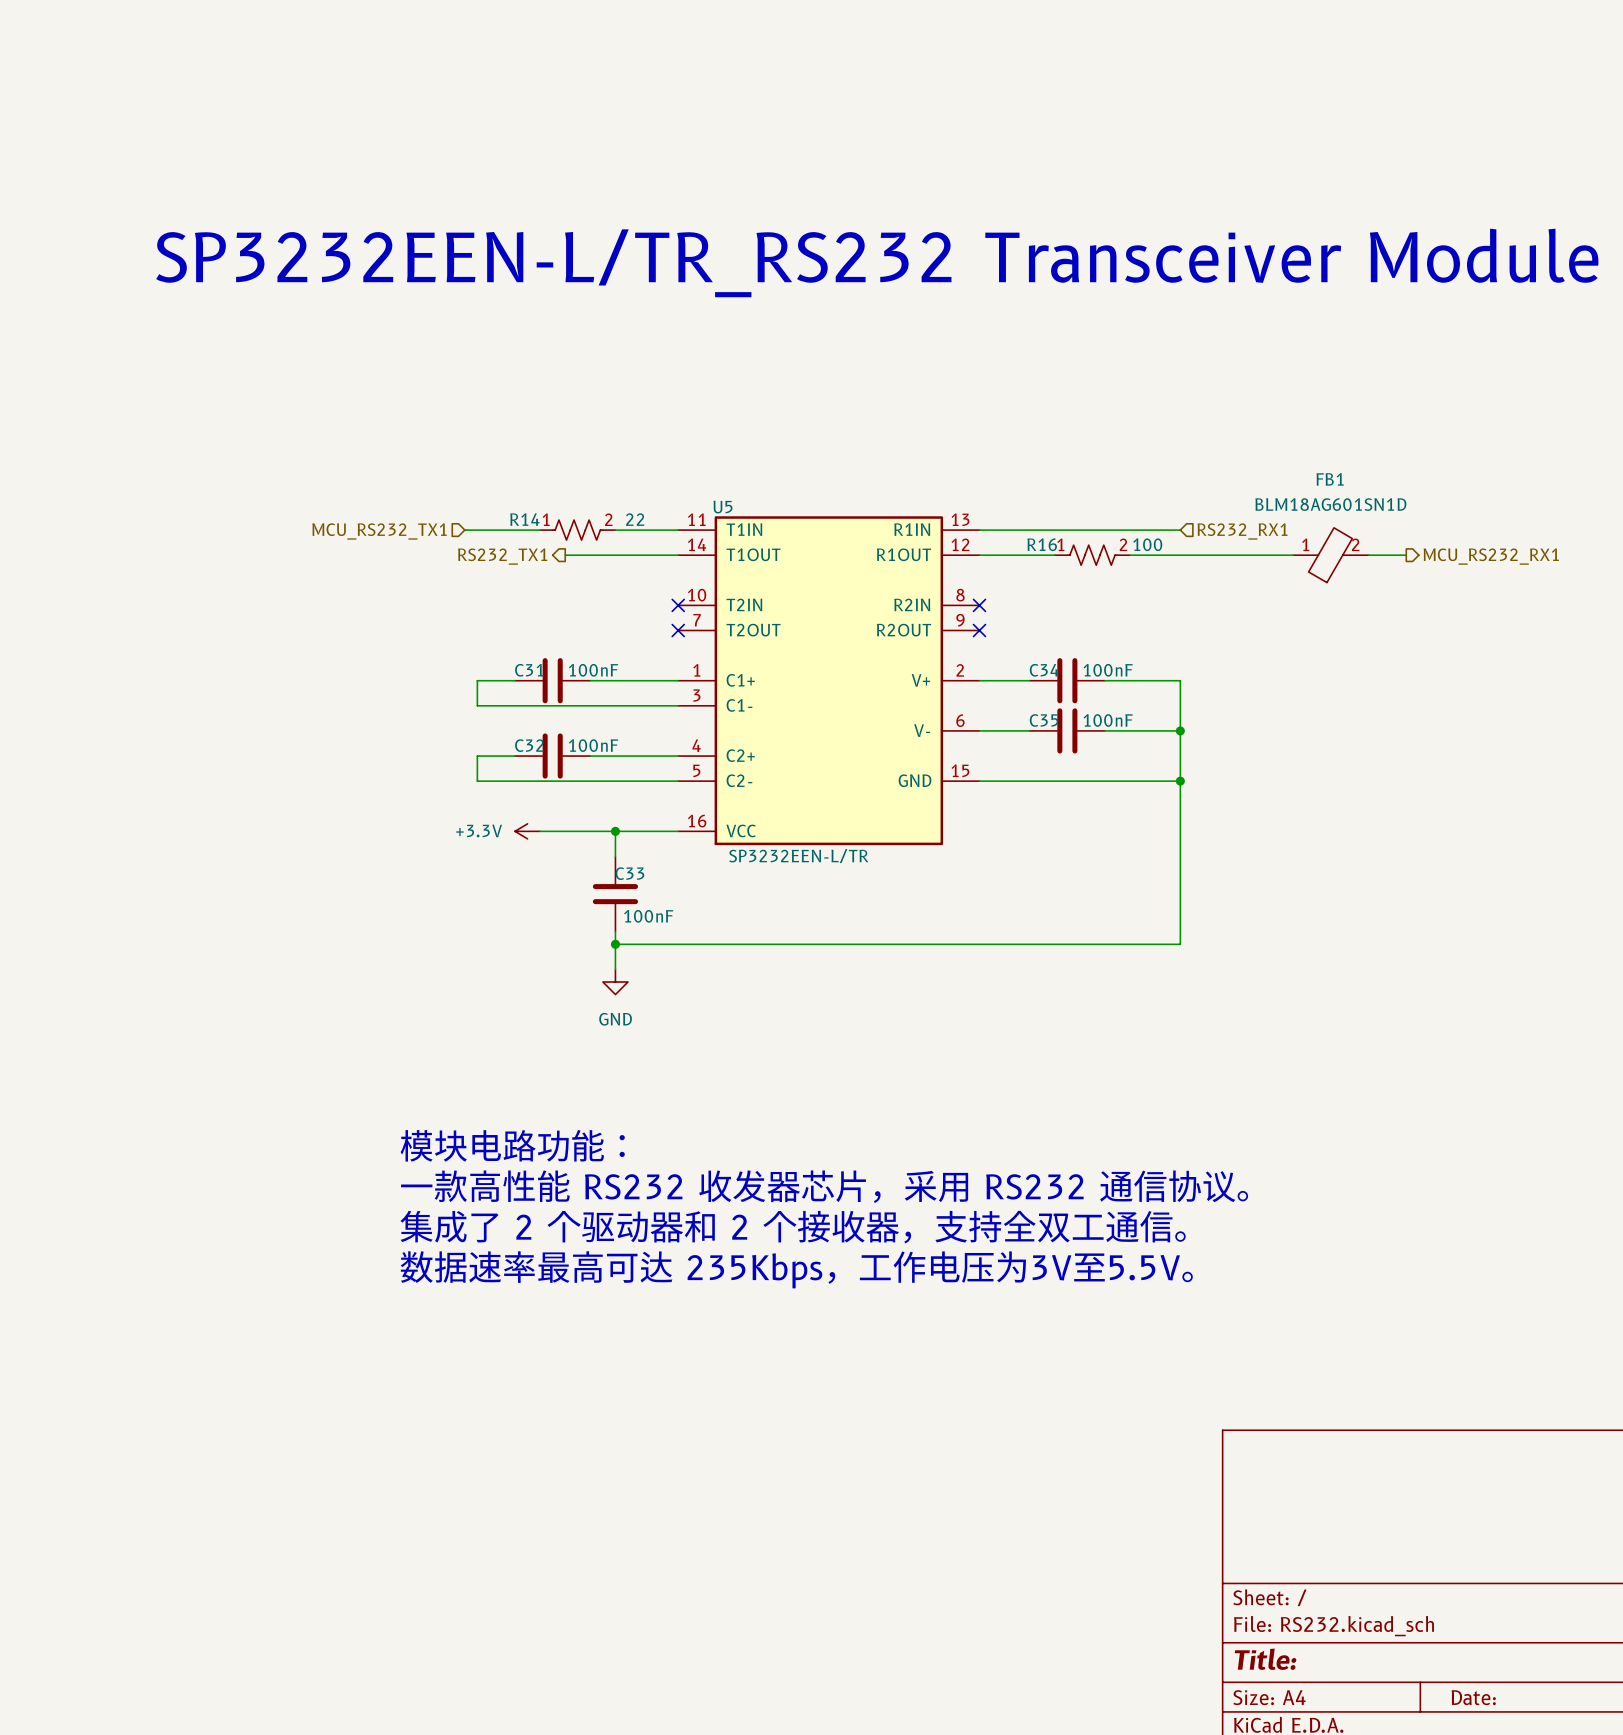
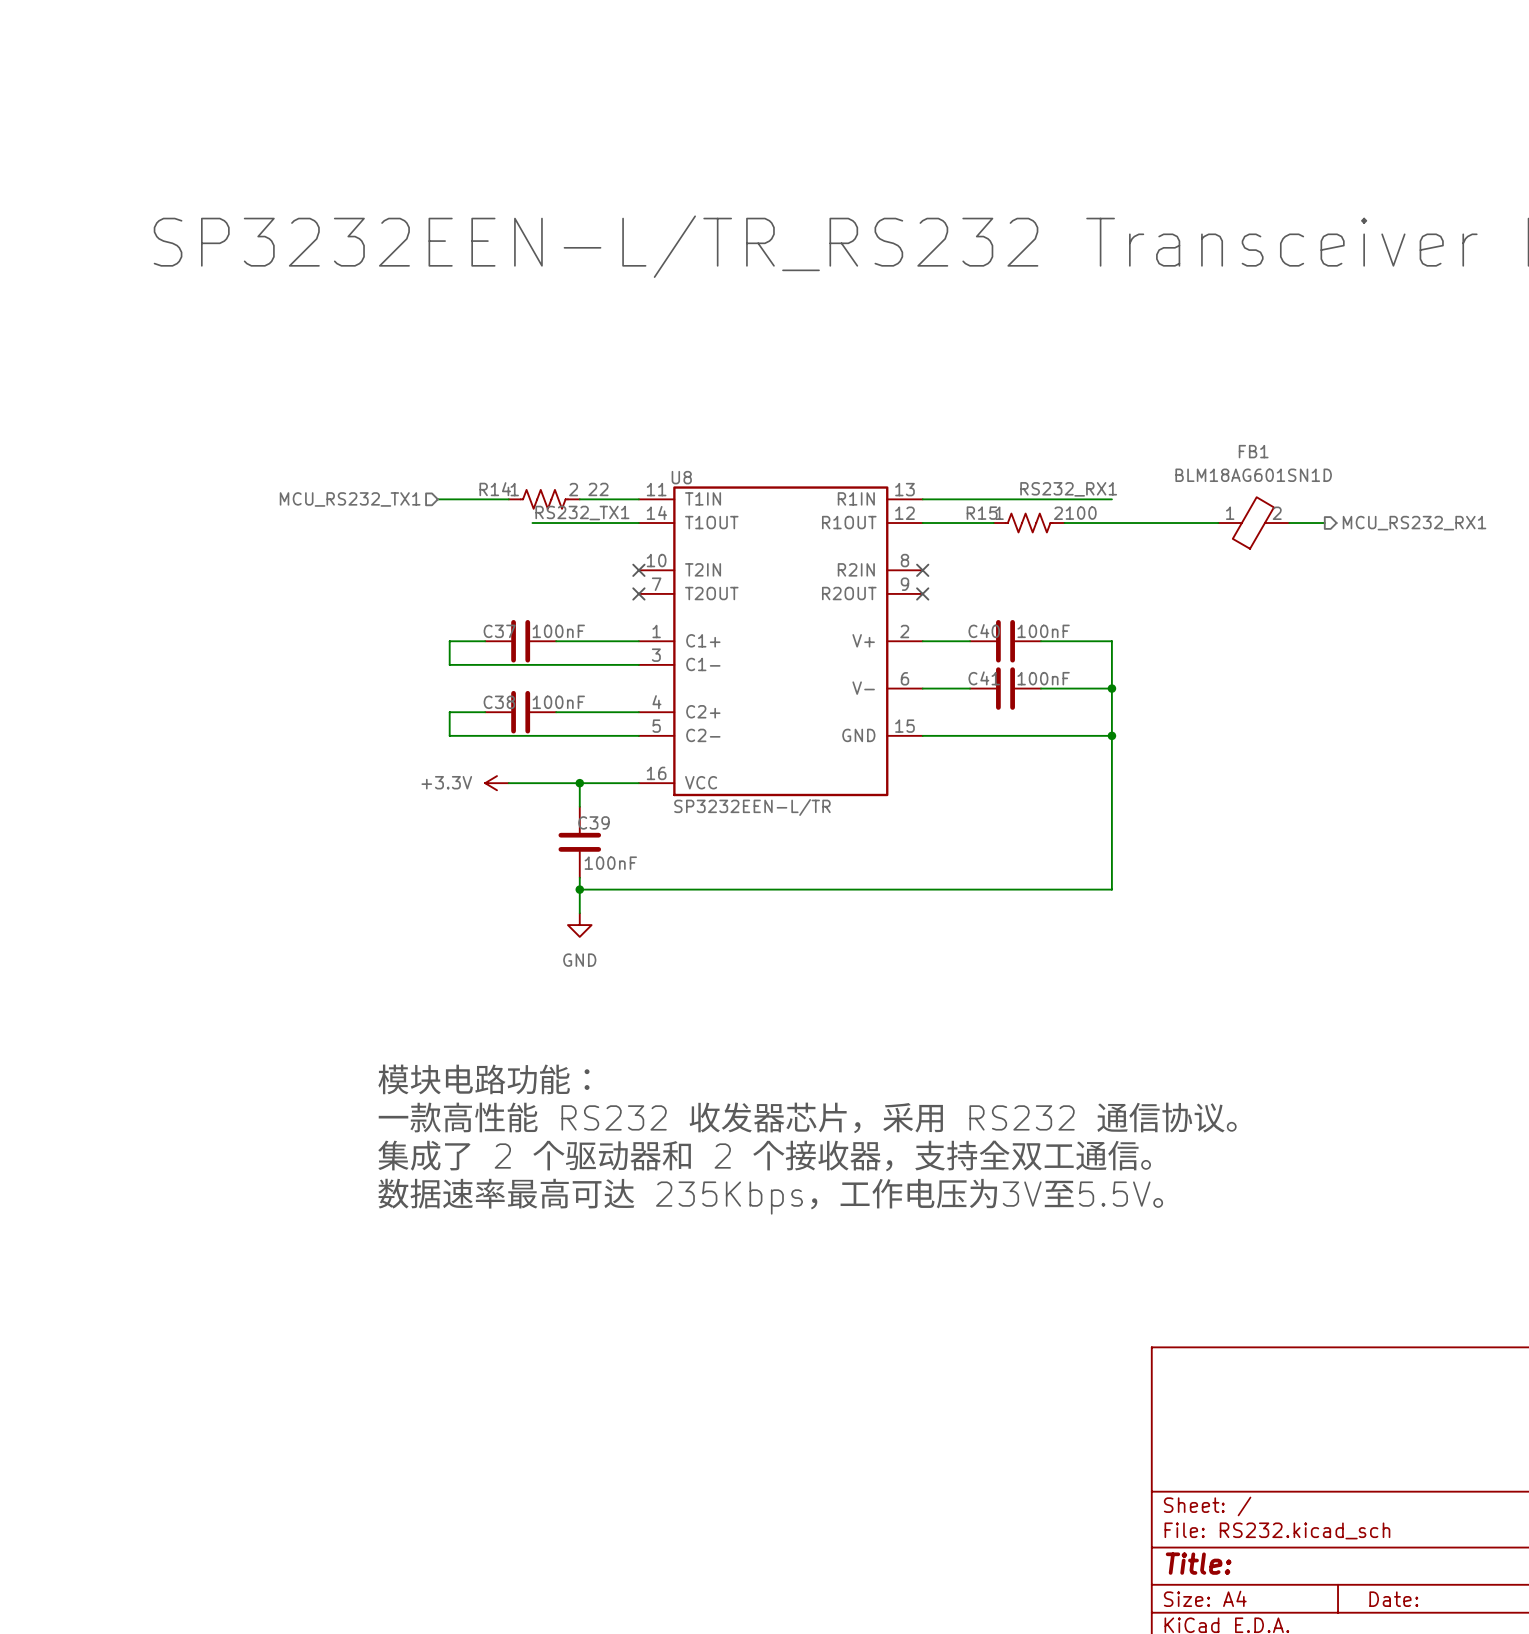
U5 name: U5 (722, 507) -> U8 (681, 477)
label: none -> RS232_RX1 (1068, 489)
hierarchical label: RS232_RX1 (1242, 531) -> none
R16 name: R16 (1042, 544) -> R15 (982, 513)
label: none -> RS232_TX1 (582, 513)
hierarchical label: RS232_TX1 (502, 556) -> none
C31 name: C31 (529, 670) -> C37 (499, 631)
C34 name: C34 (1044, 670) -> C40 (984, 631)
C35 name: C35 (1044, 720) -> C41 (984, 678)
C32 name: C32 (529, 745) -> C38 (499, 702)
C33 name: C33 (629, 873) -> C39 (593, 822)

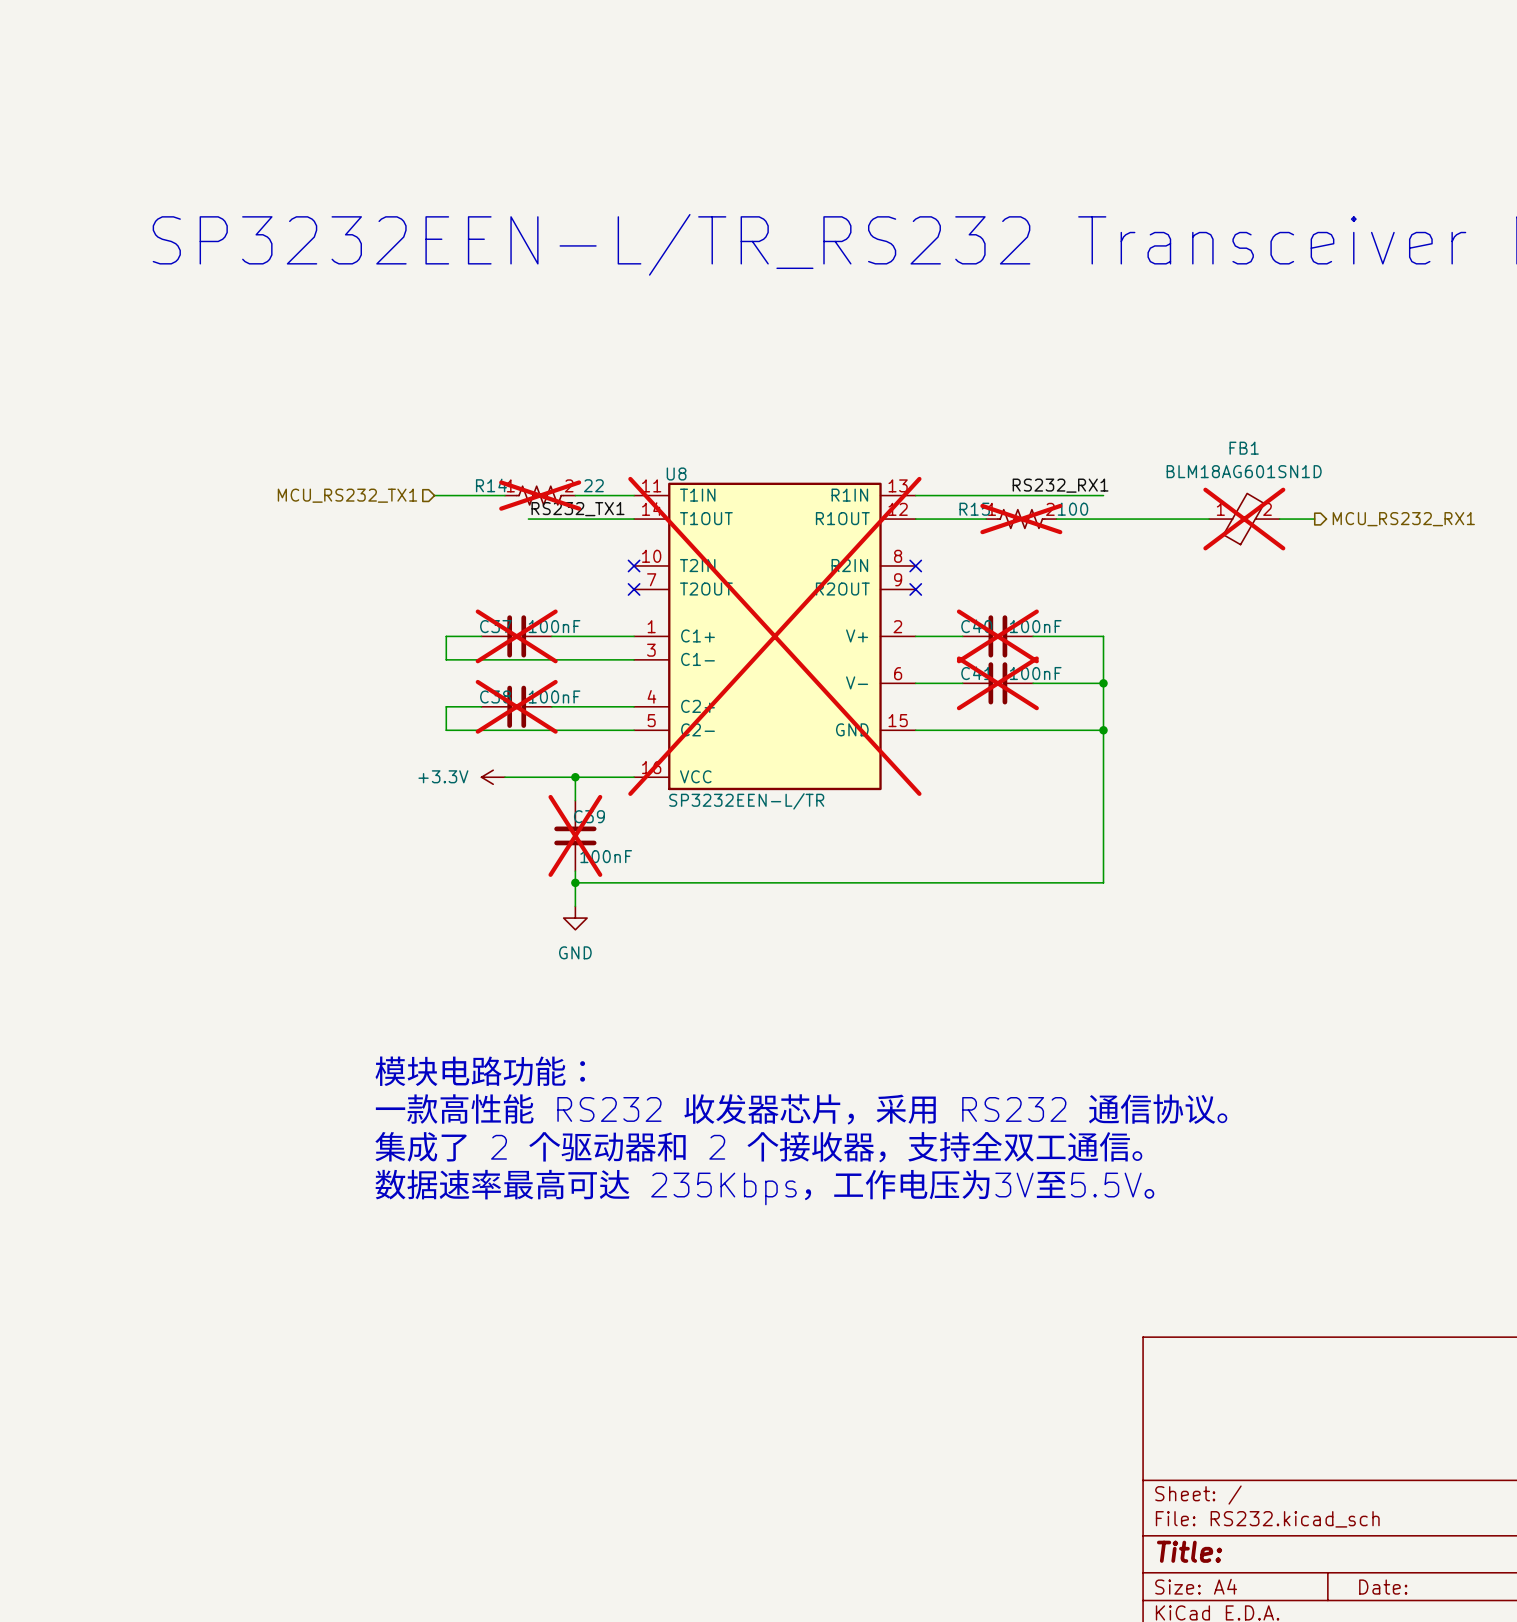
R14 do-not-place cross: none -> (540, 495)
R15 do-not-place cross: none -> (1021, 519)
FB1 do-not-place cross: none -> (1244, 519)
C37 do-not-place cross: none -> (516, 636)
U8 do-not-place cross: none -> (774, 636)
C40 do-not-place cross: none -> (997, 636)
C41 do-not-place cross: none -> (997, 683)
C38 do-not-place cross: none -> (516, 706)
C39 do-not-place cross: none -> (575, 835)

